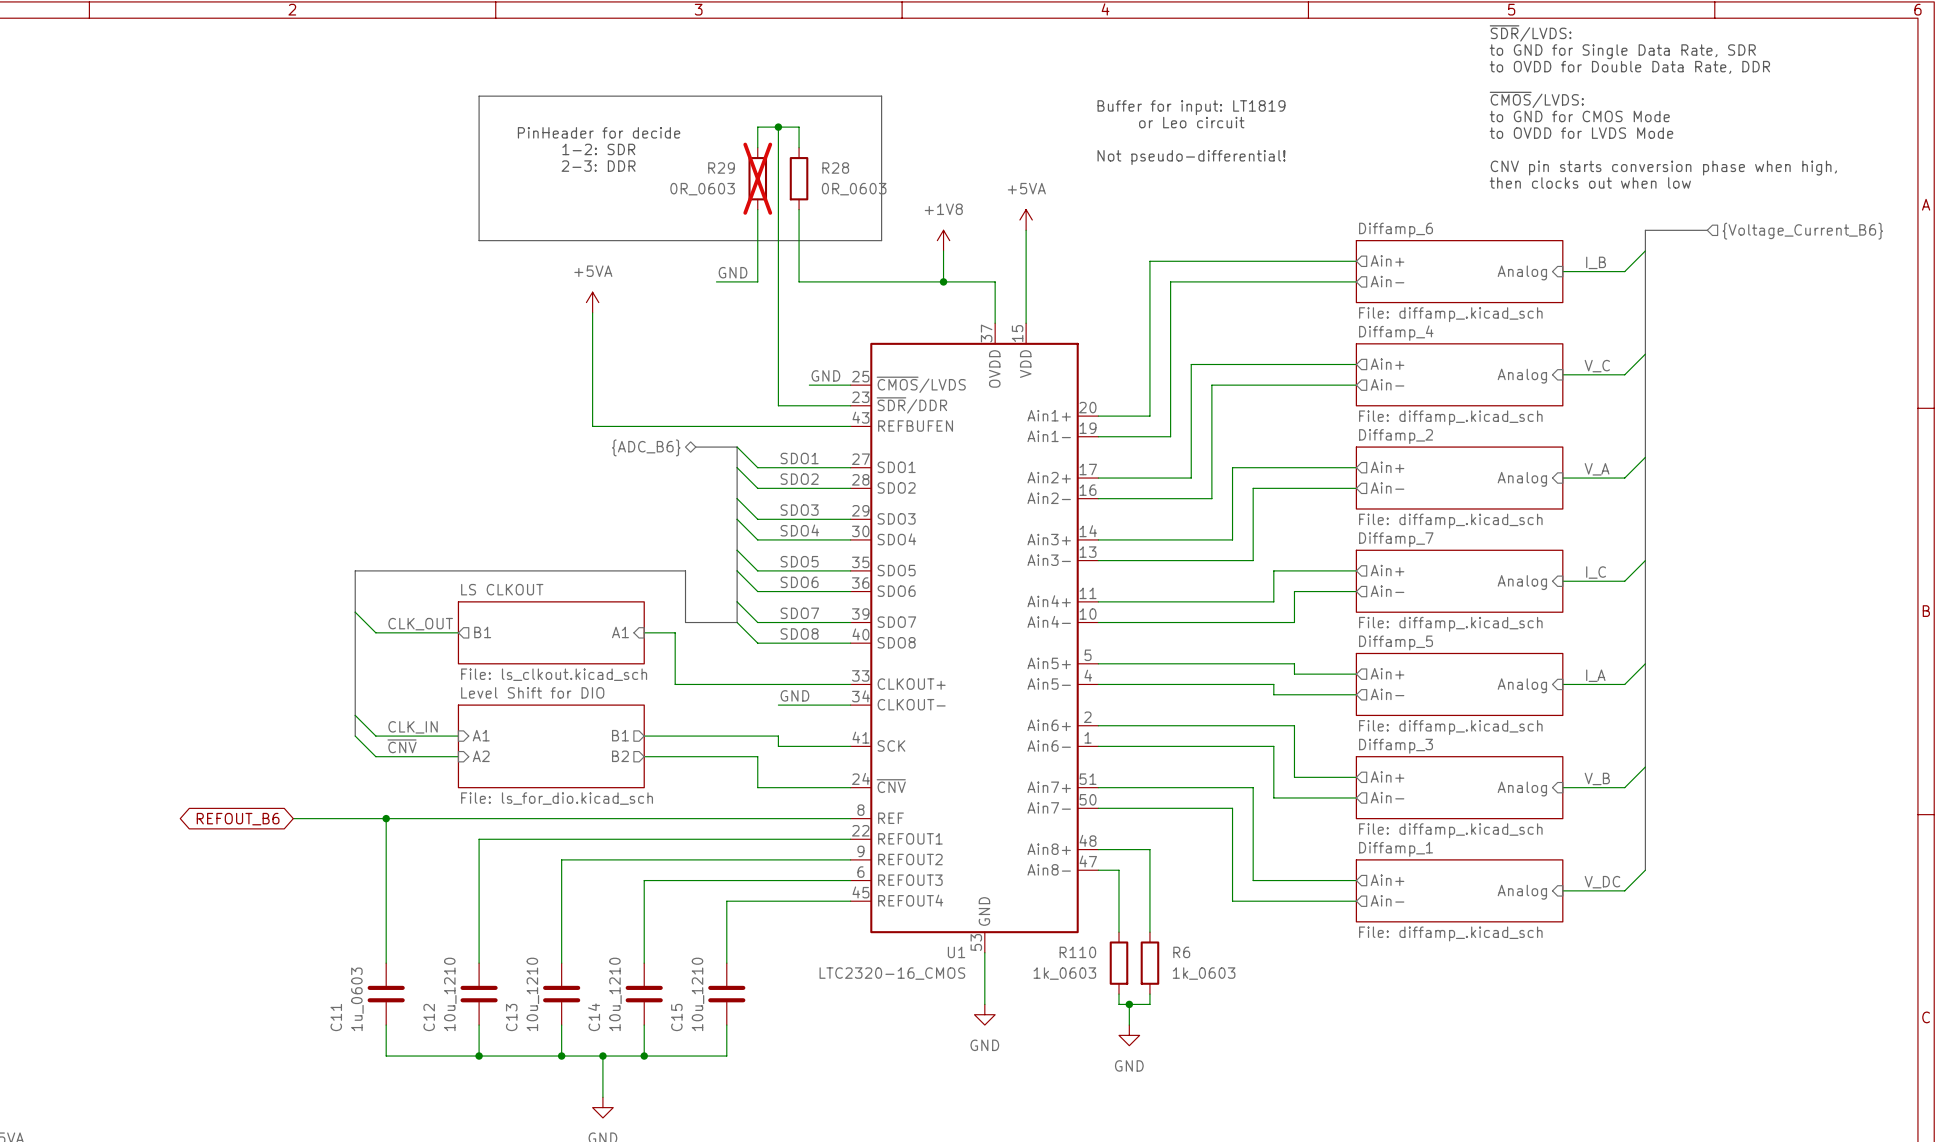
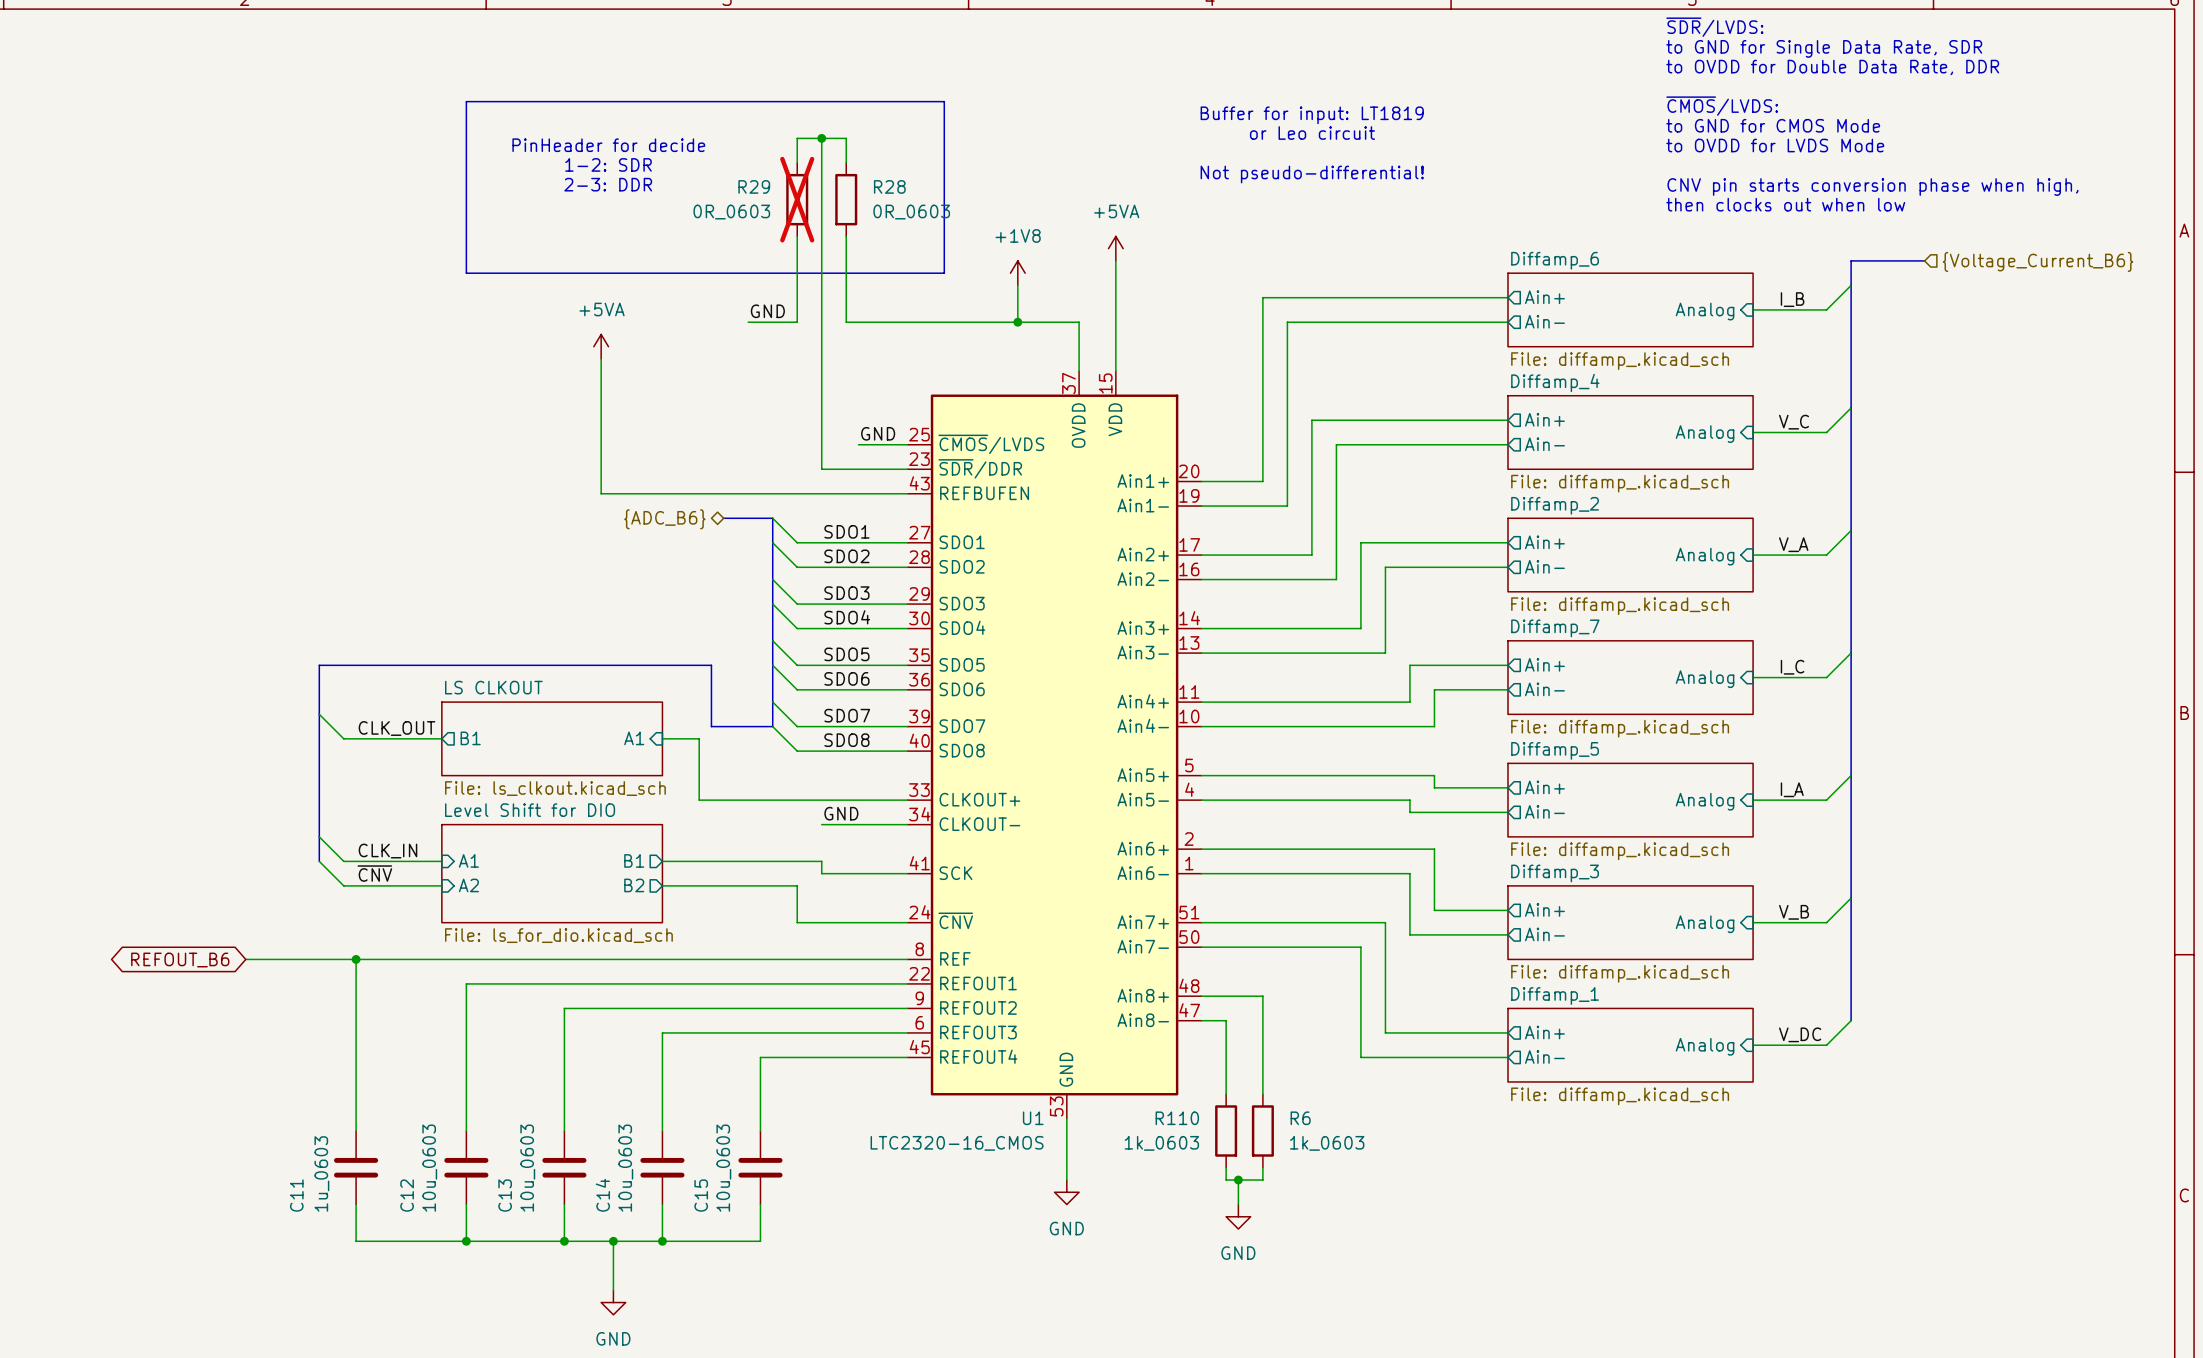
C12 value: 10u_1210 (450, 994) -> 10u_0603 (429, 1168)
C13 value: 10u_1210 (532, 994) -> 10u_0603 (527, 1168)
C14 value: 10u_1210 (615, 994) -> 10u_0603 (625, 1168)
C15 value: 10u_1210 (698, 994) -> 10u_0603 (723, 1168)

